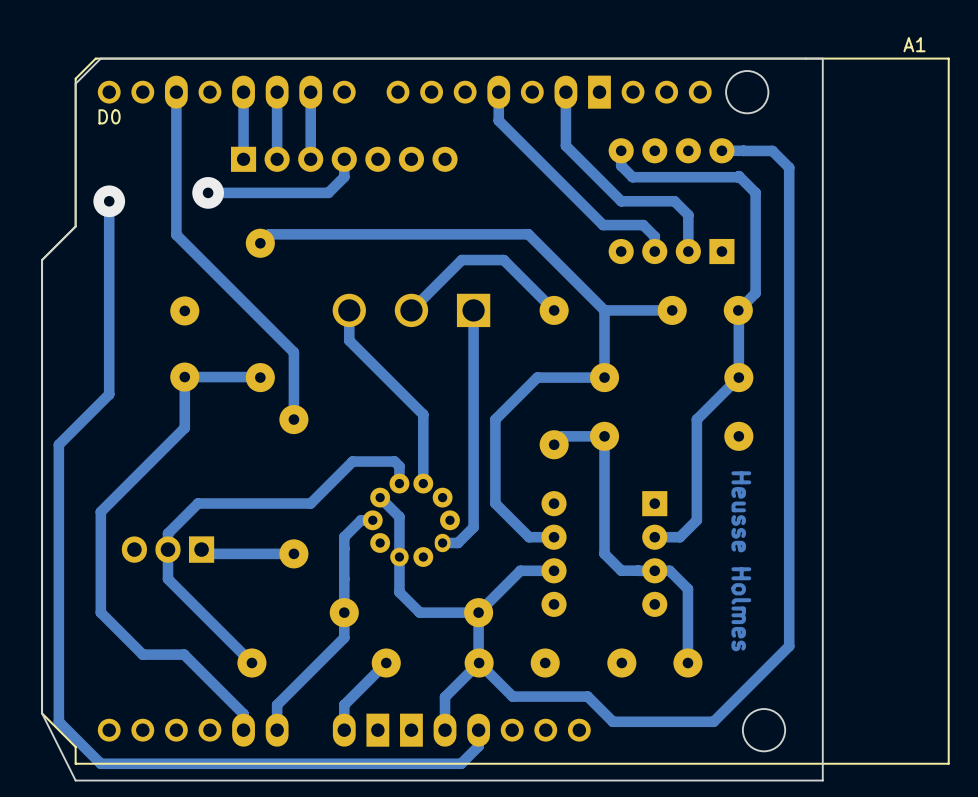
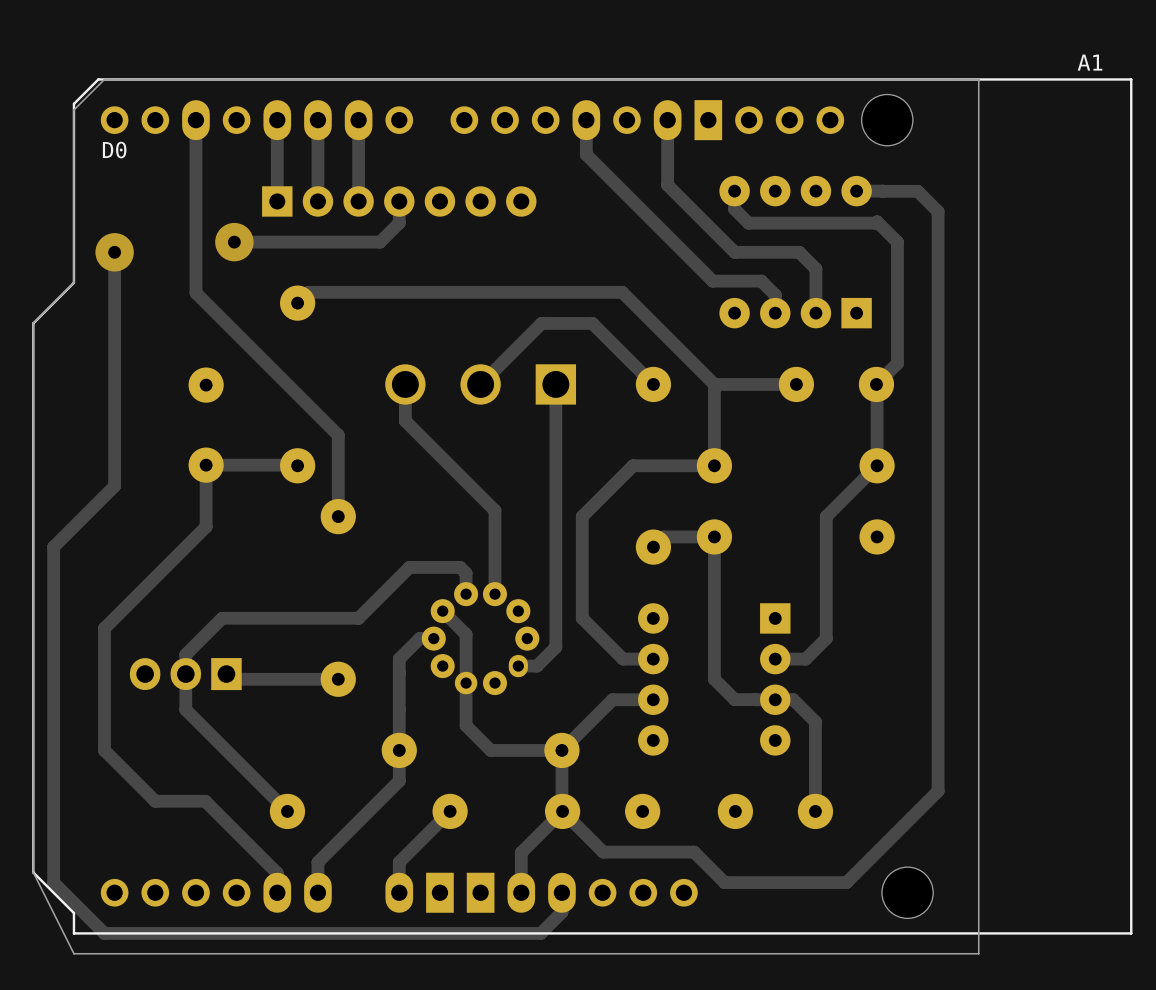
text: Heusse Holmes (741, 561) -> none

